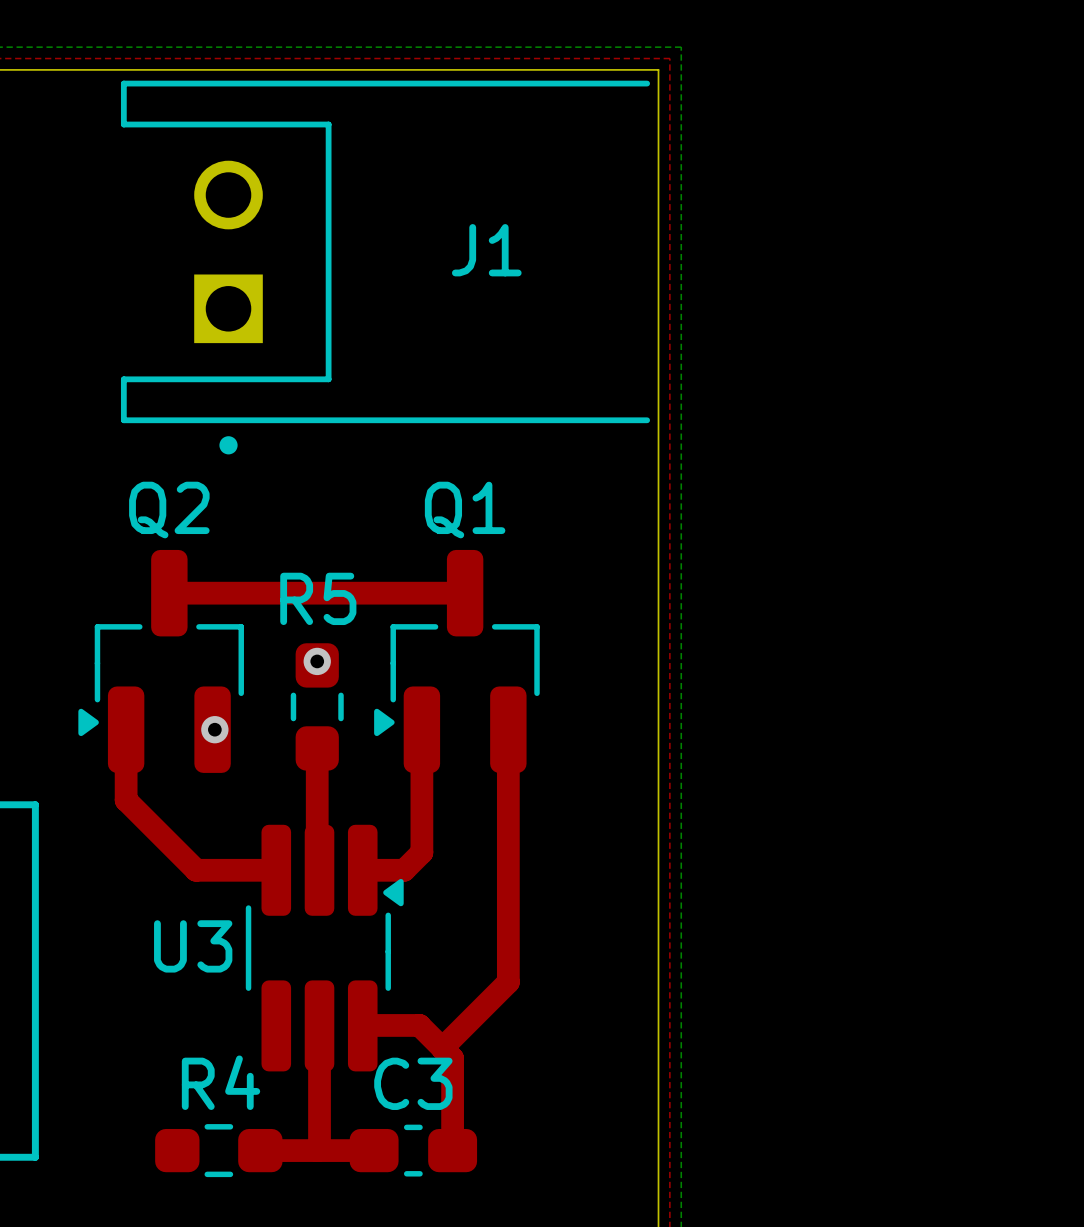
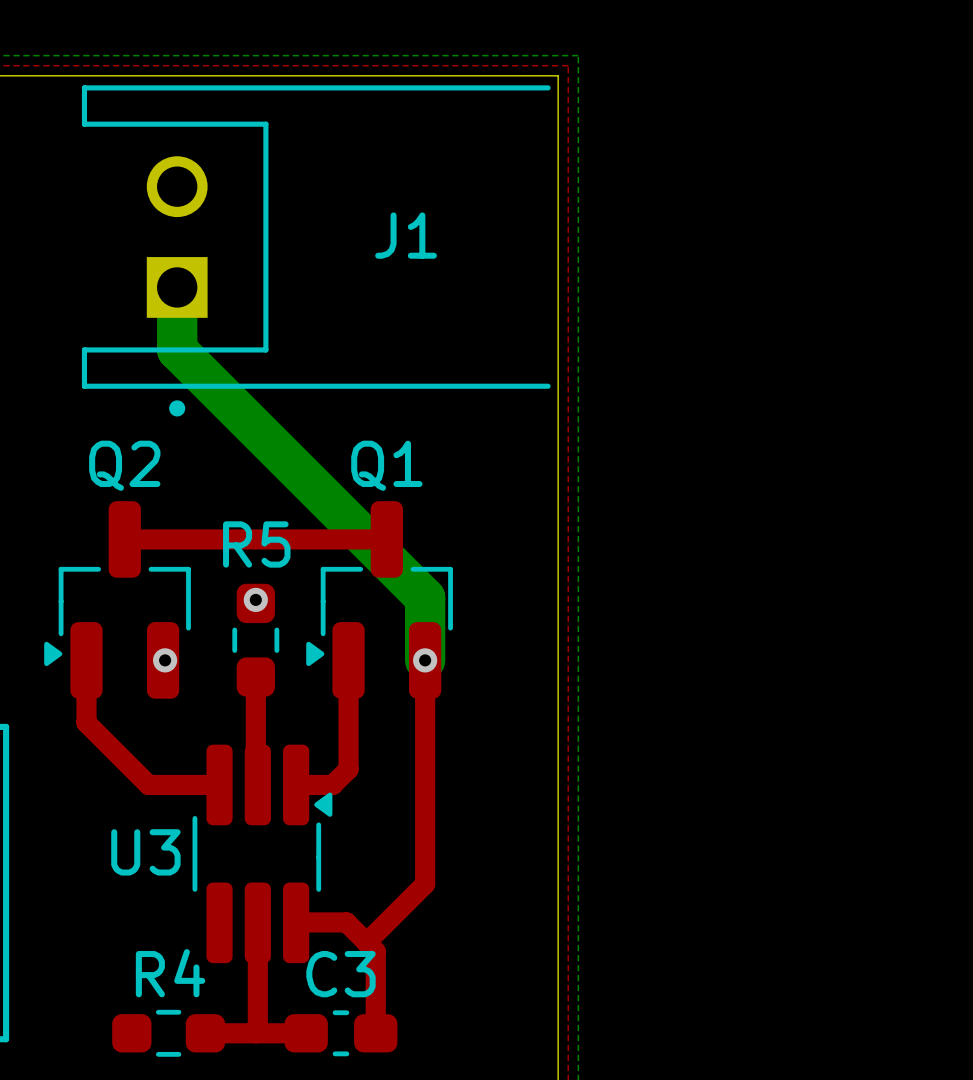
bottom track: none -> (177, 287) (177, 349) (425, 597) (425, 660)
via: none -> (425, 660)

